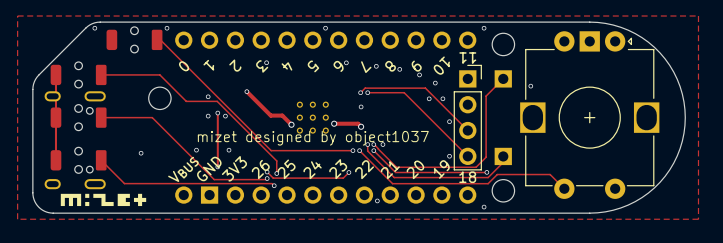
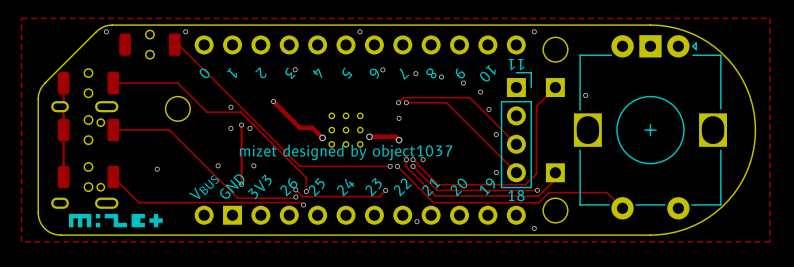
via: (429, 98) -> none

